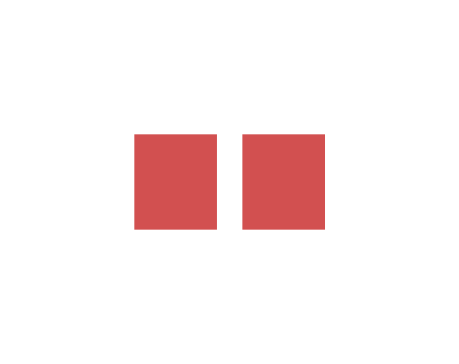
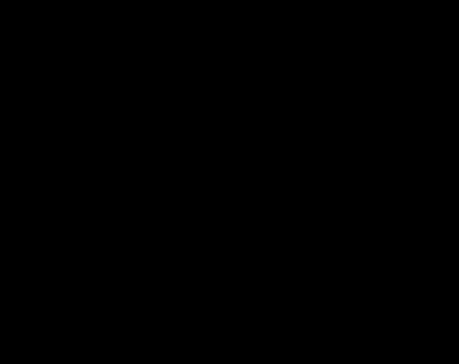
part: (229, 181) -> none

